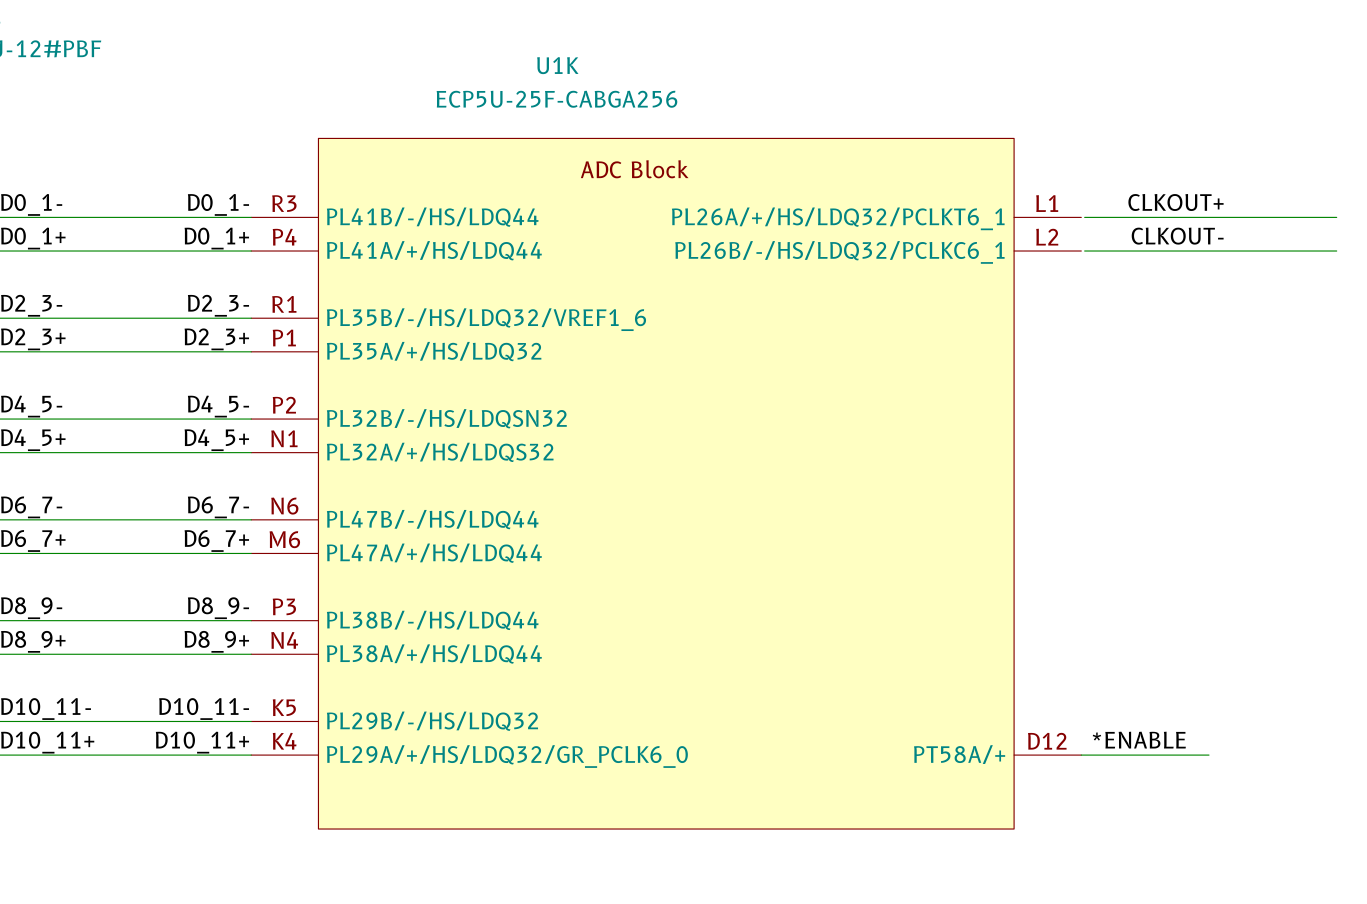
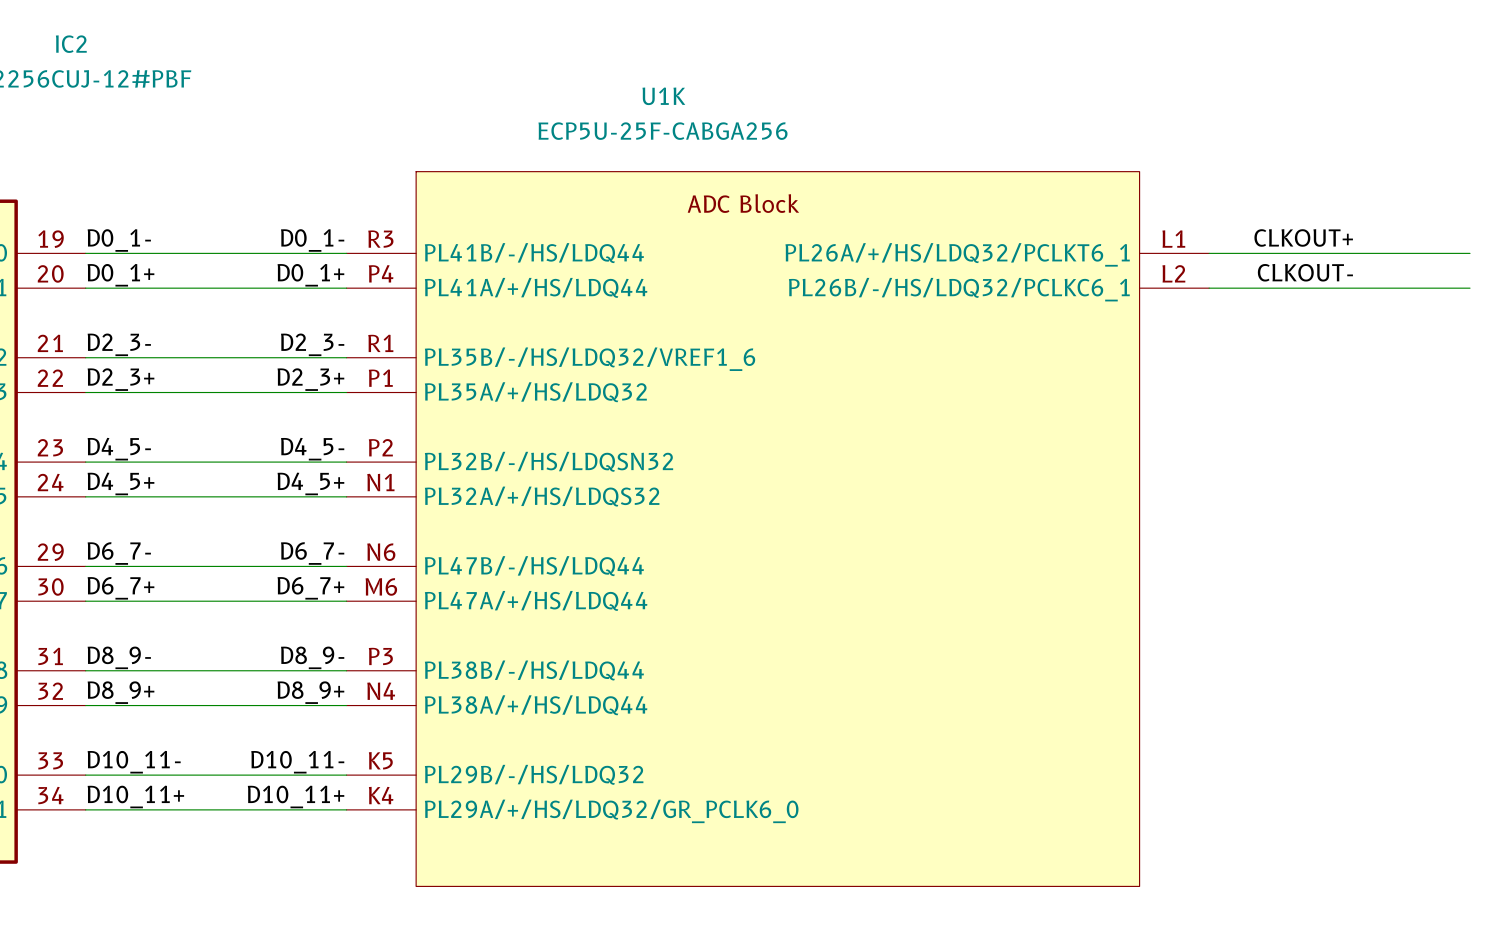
U1K symbol: [251, 138, 1082, 830] -> [346, 171, 1210, 887]
label: *ENABLE (1139, 740) -> none
wire: (1081, 755) (1208, 755) -> none

